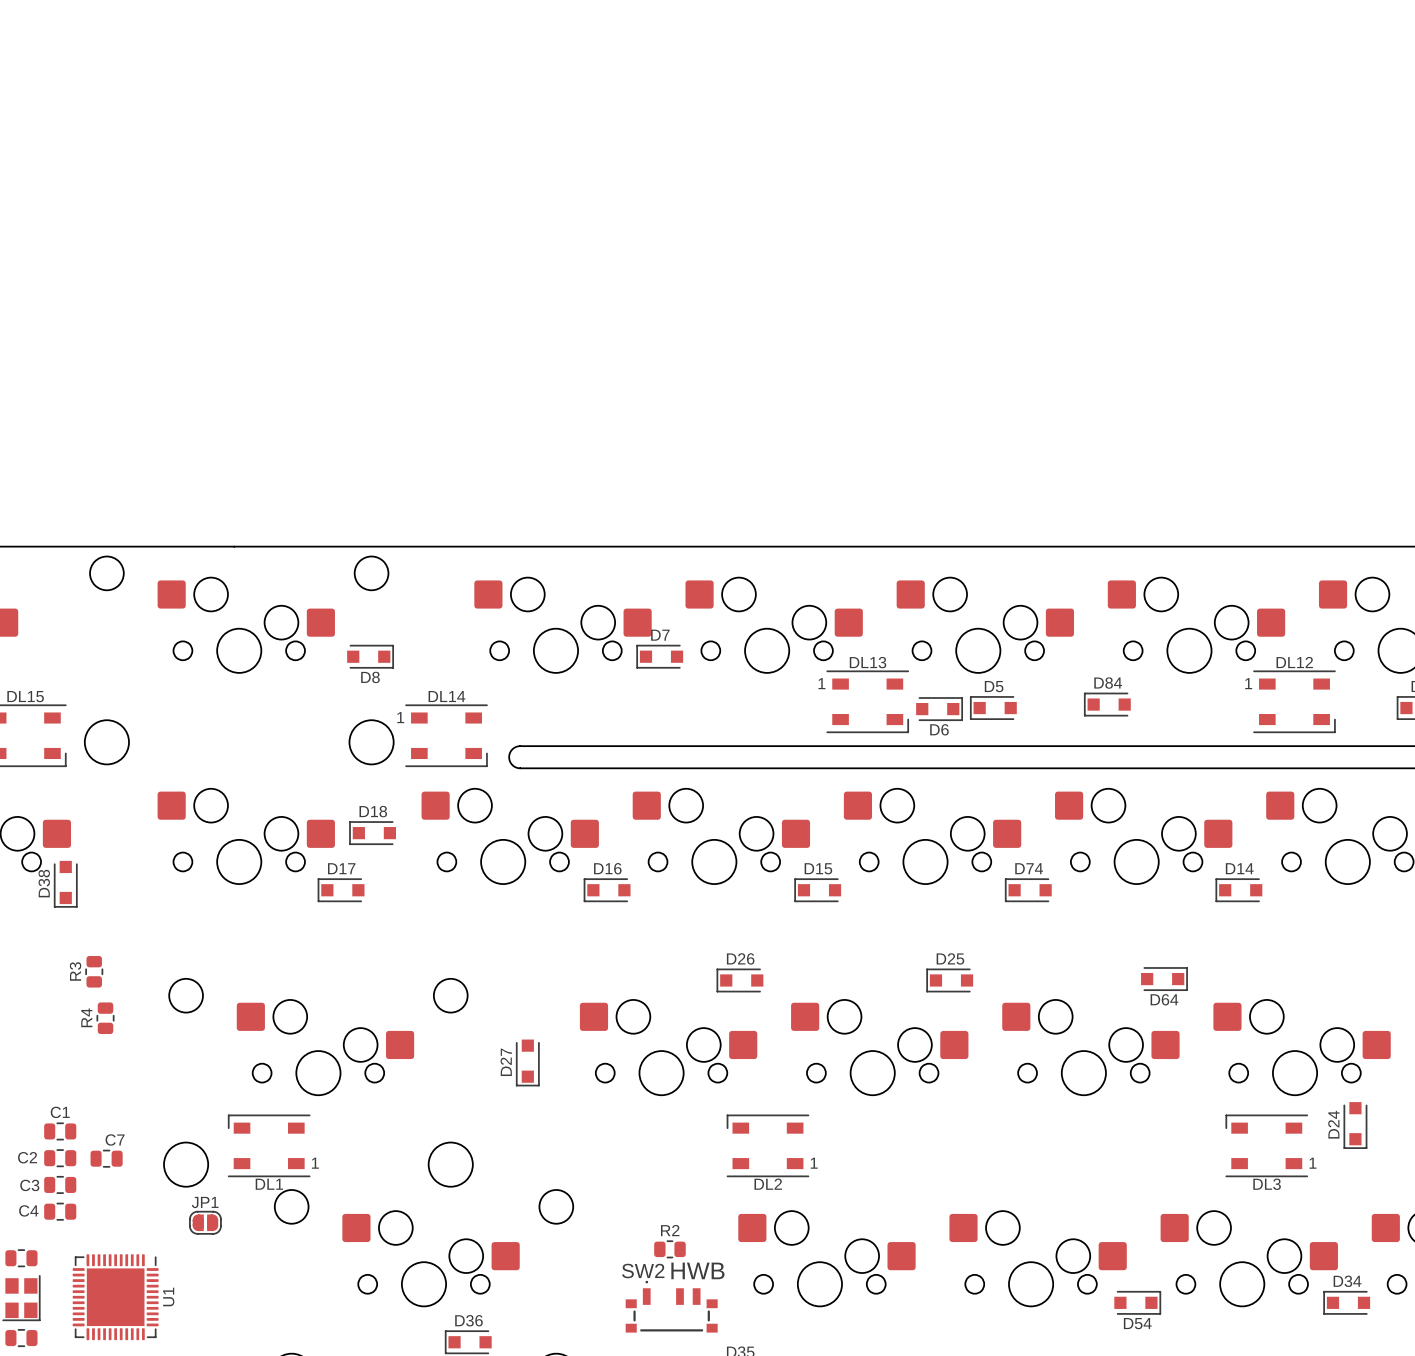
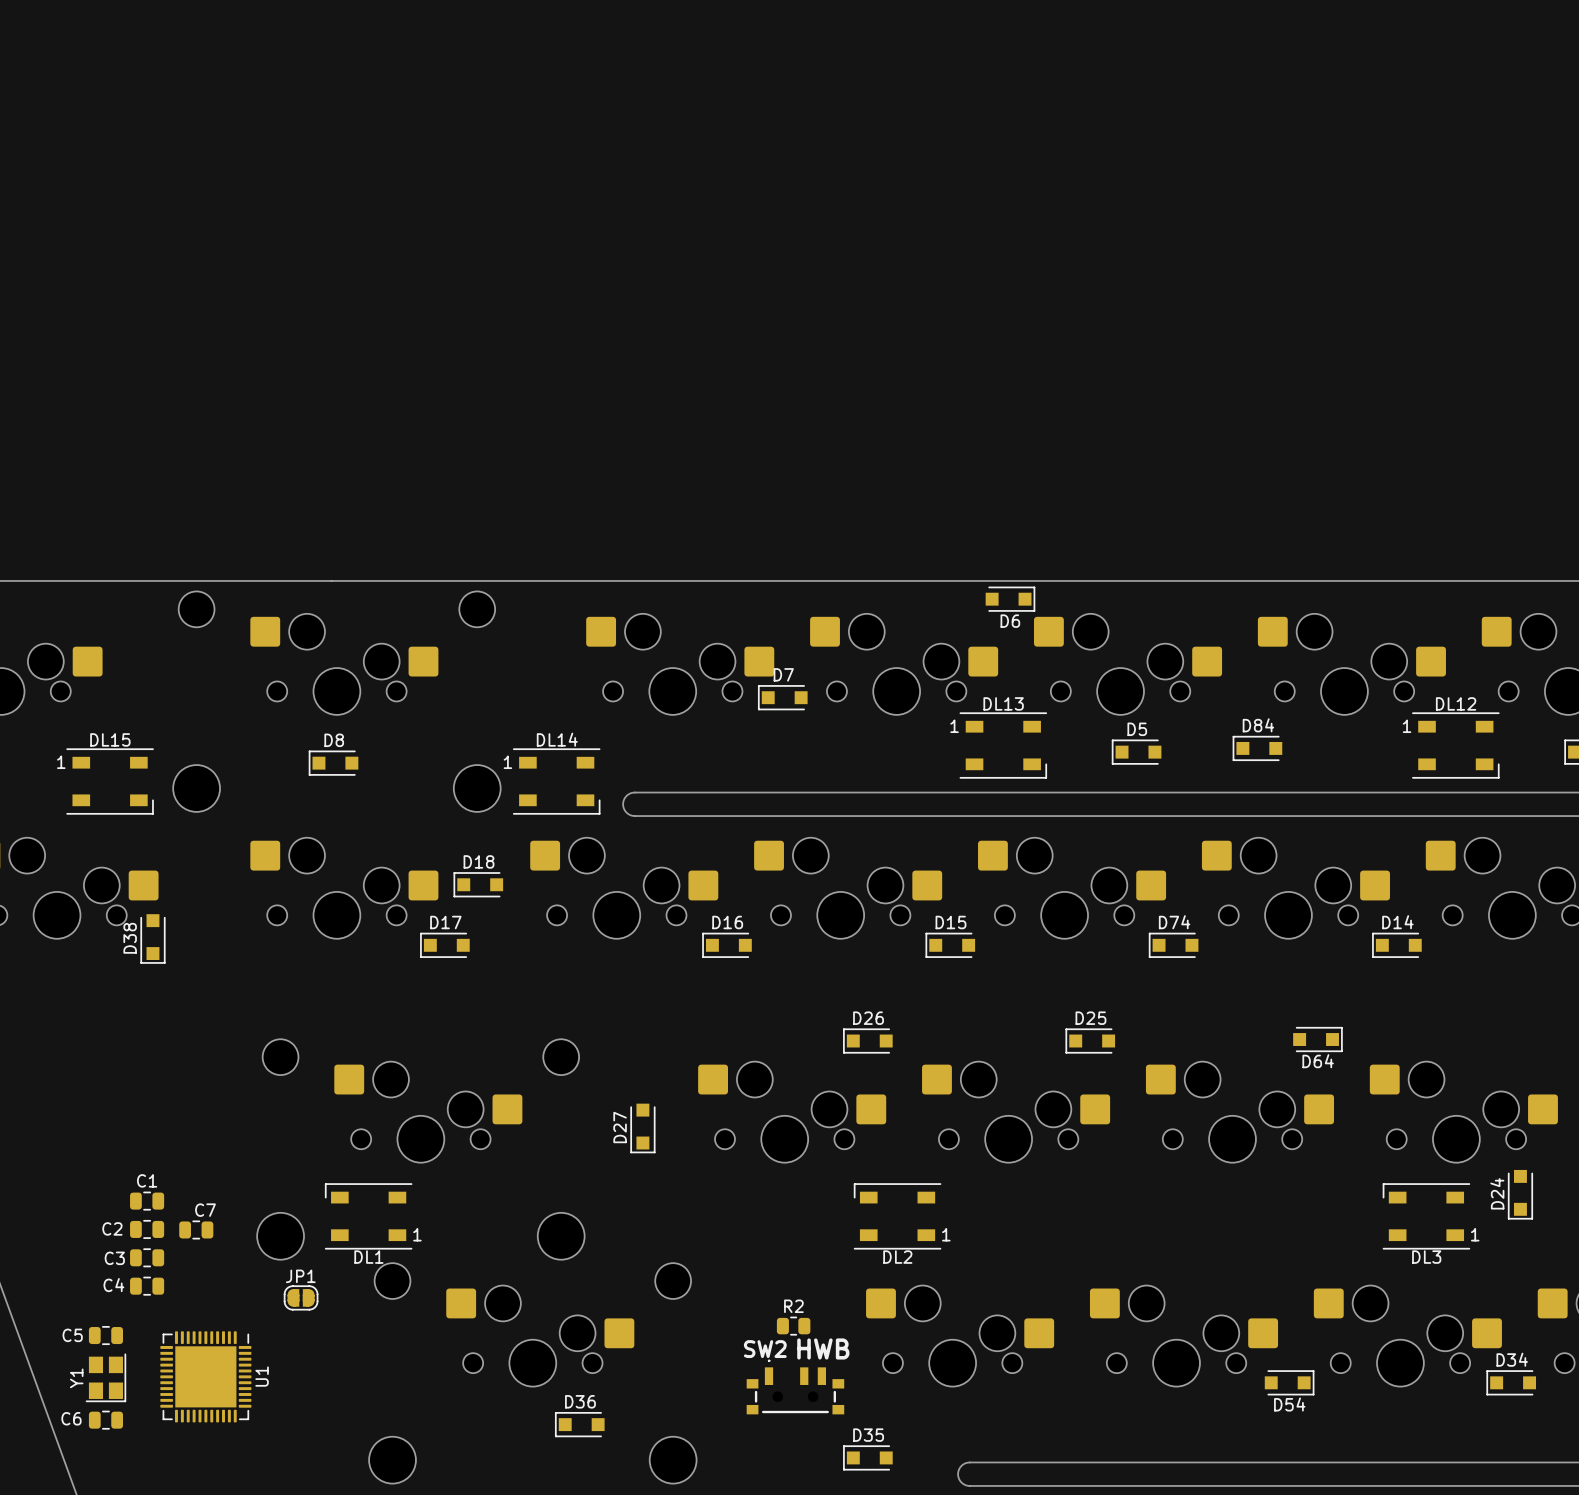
D8 rotation: 0° (370, 656) -> 180° (333, 763)
D8 position: (370, 656) -> (333, 763)
D6 position: (939, 709) -> (1010, 599)
R3: (94, 971) -> none
R4: (105, 1018) -> none

